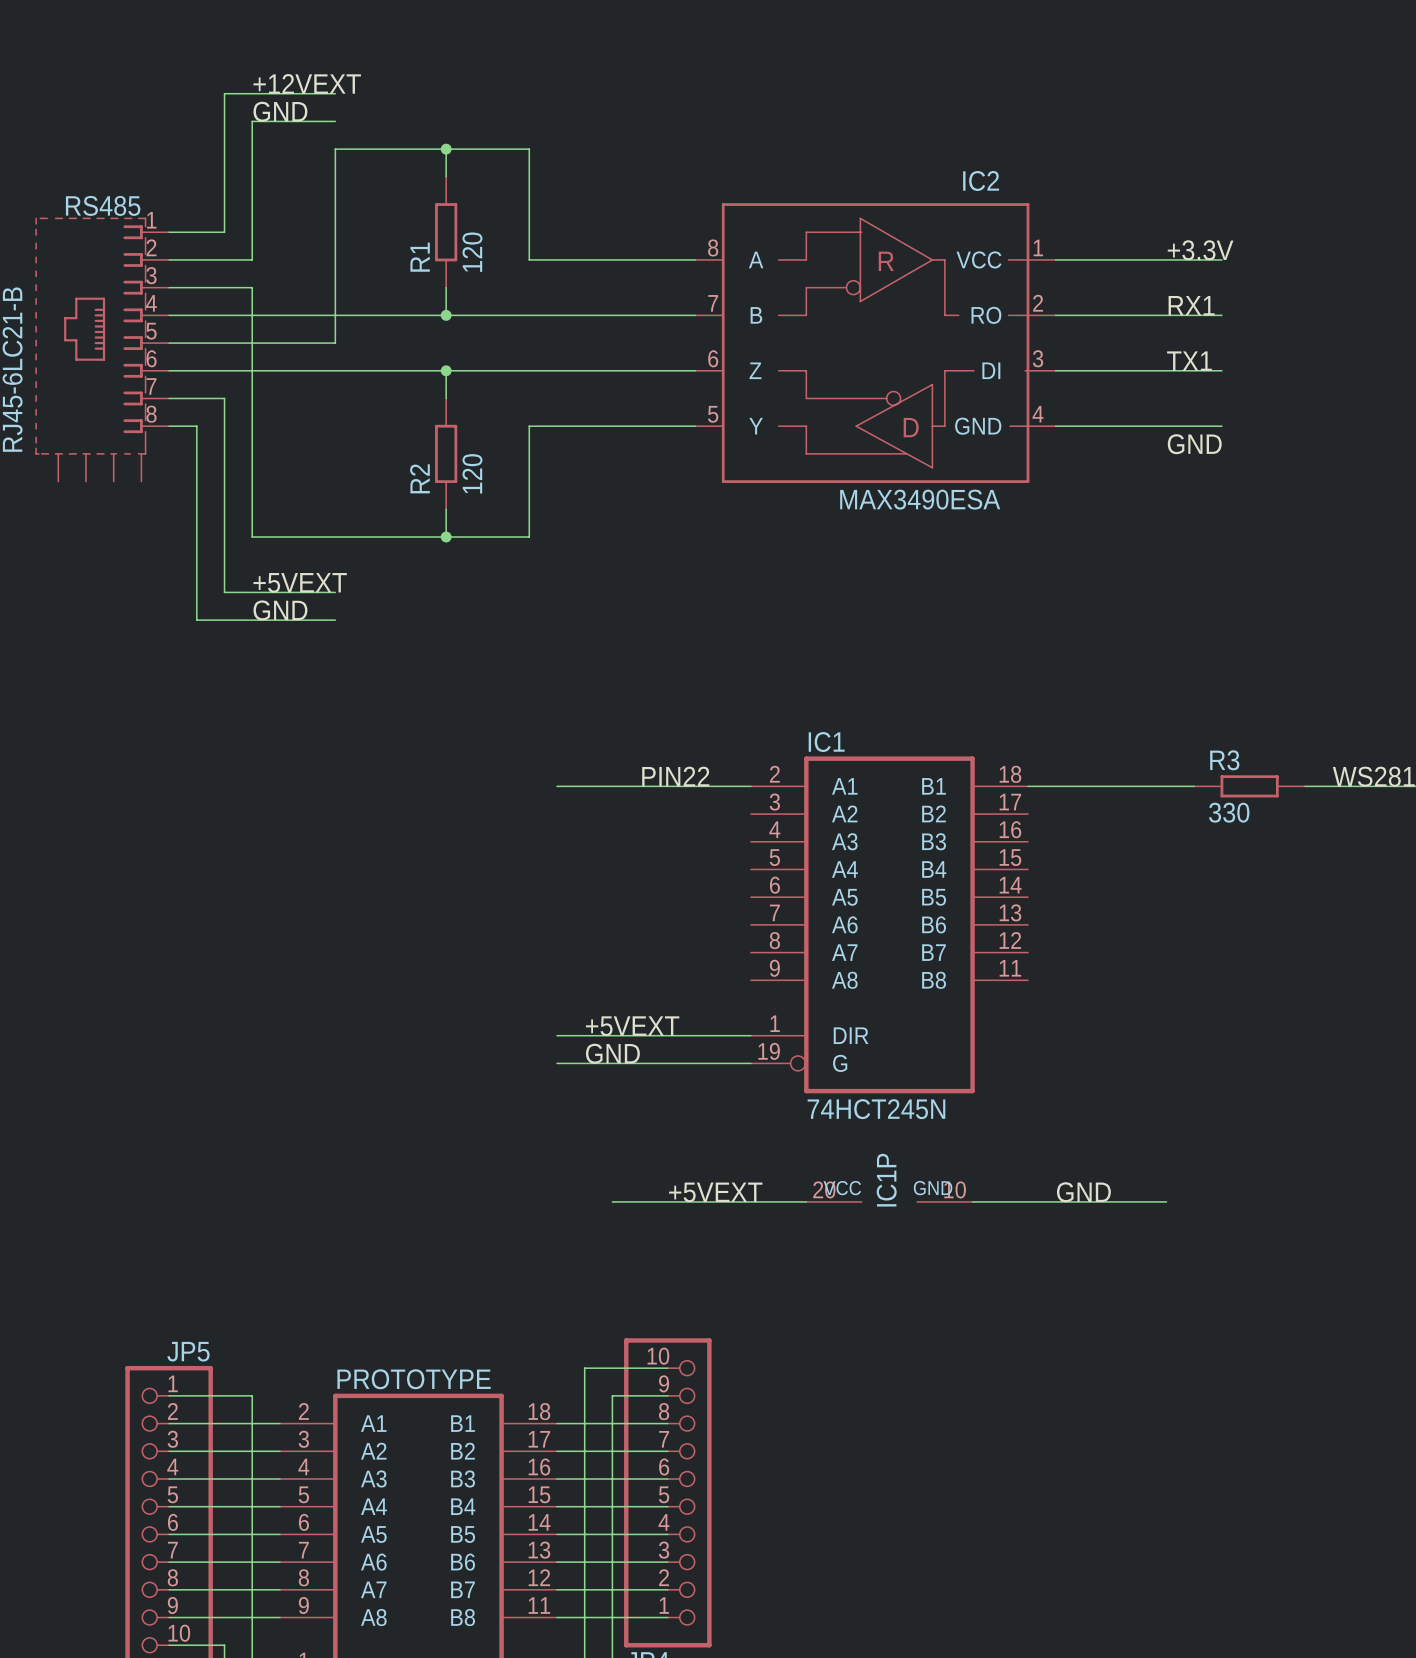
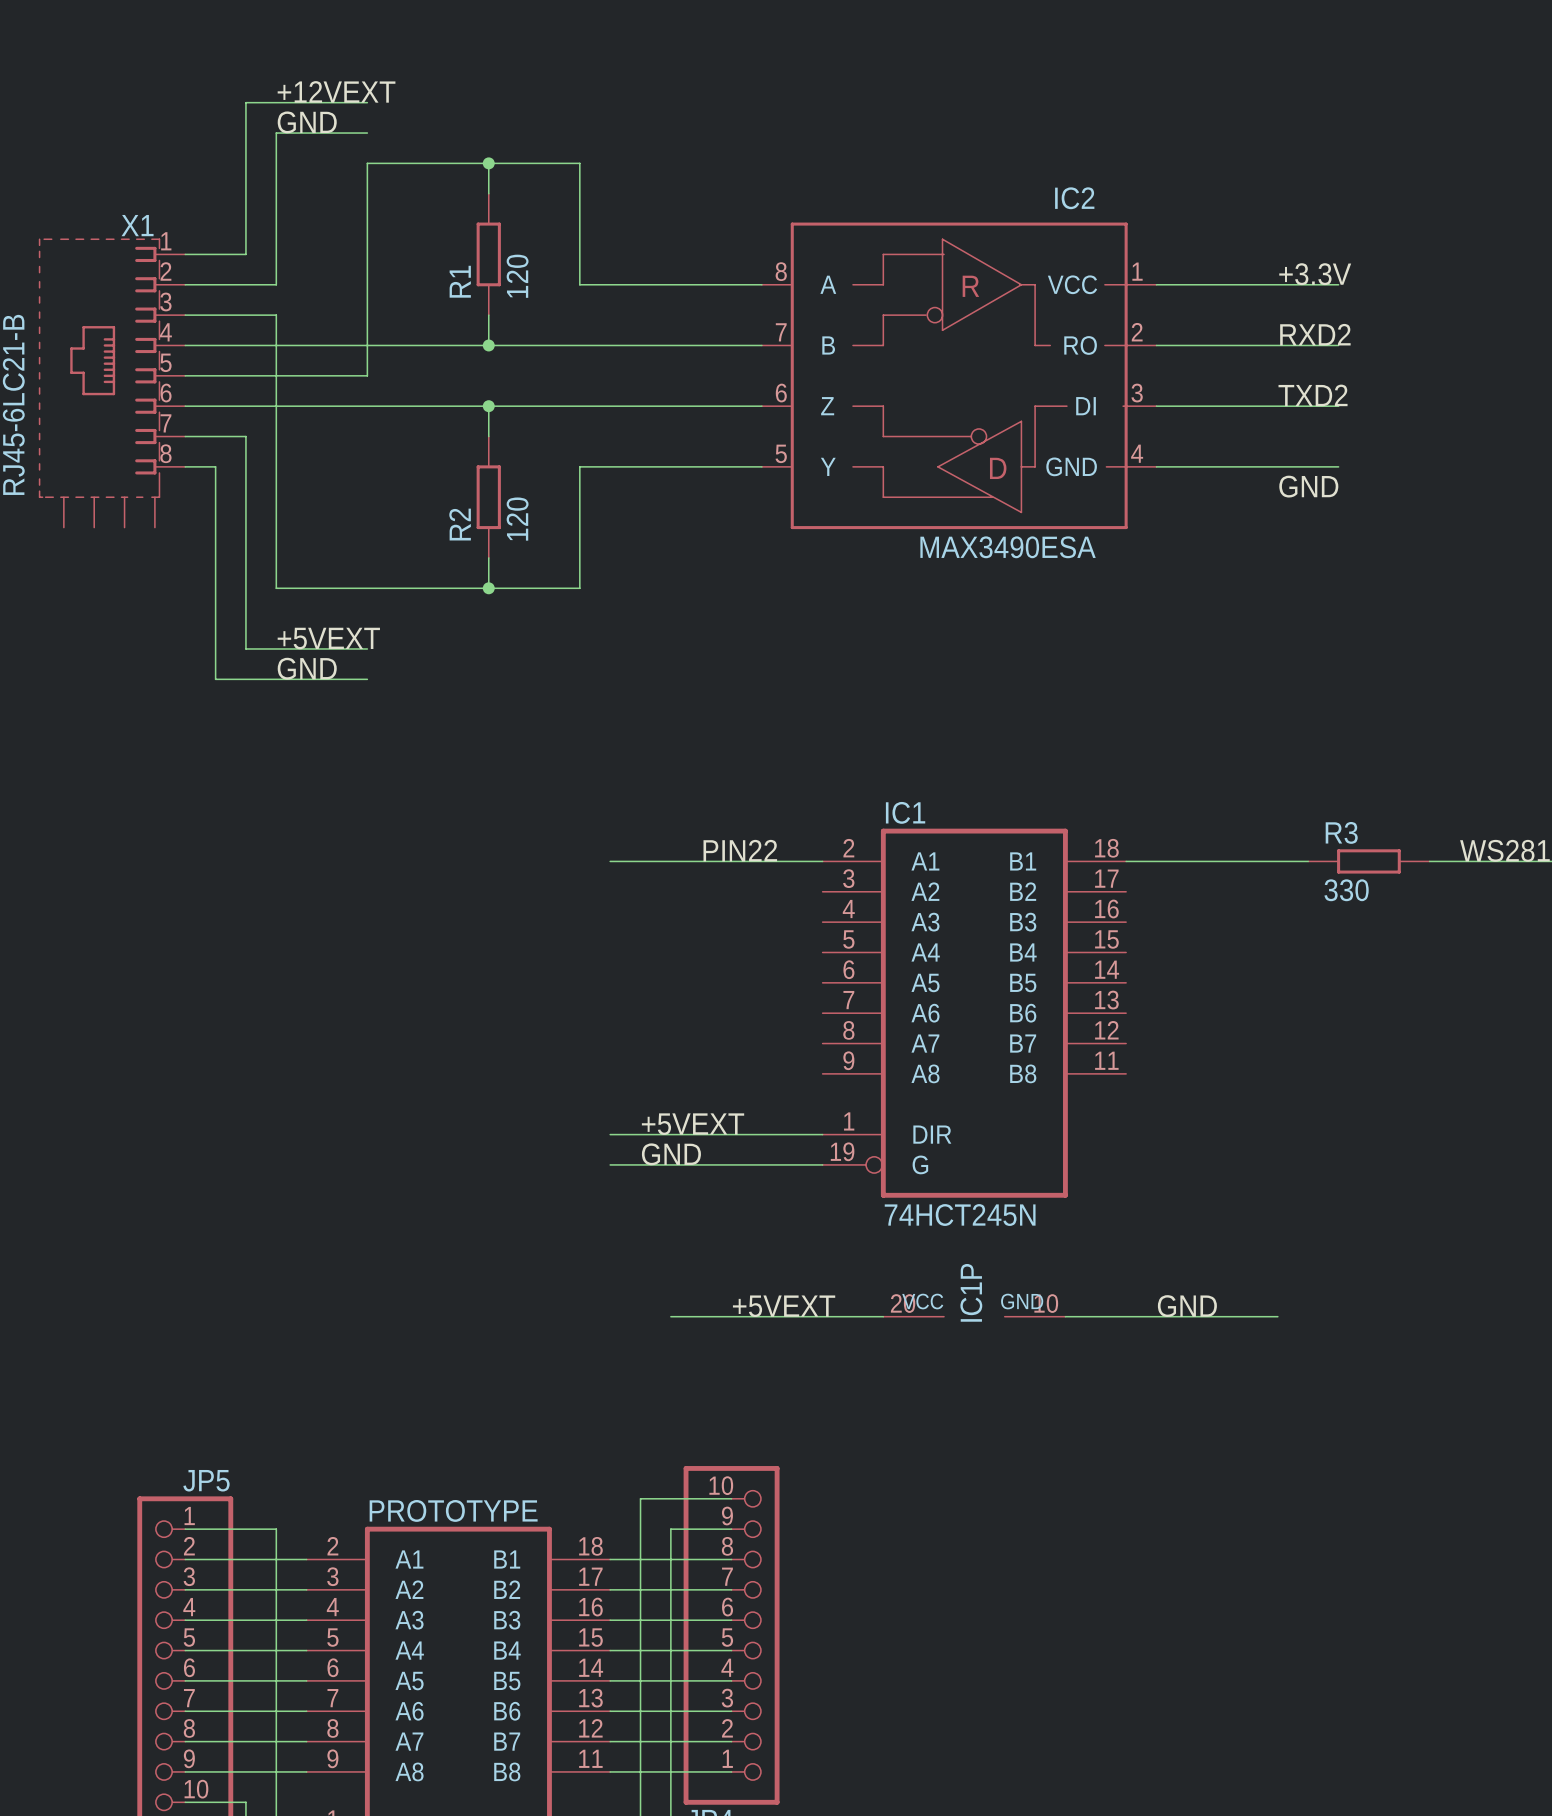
RS485 name: RS485 (103, 205) -> X1 (137, 225)
label: RX1 (1191, 305) -> RXD2 (1315, 334)
label: TX1 (1189, 361) -> TXD2 (1313, 395)

